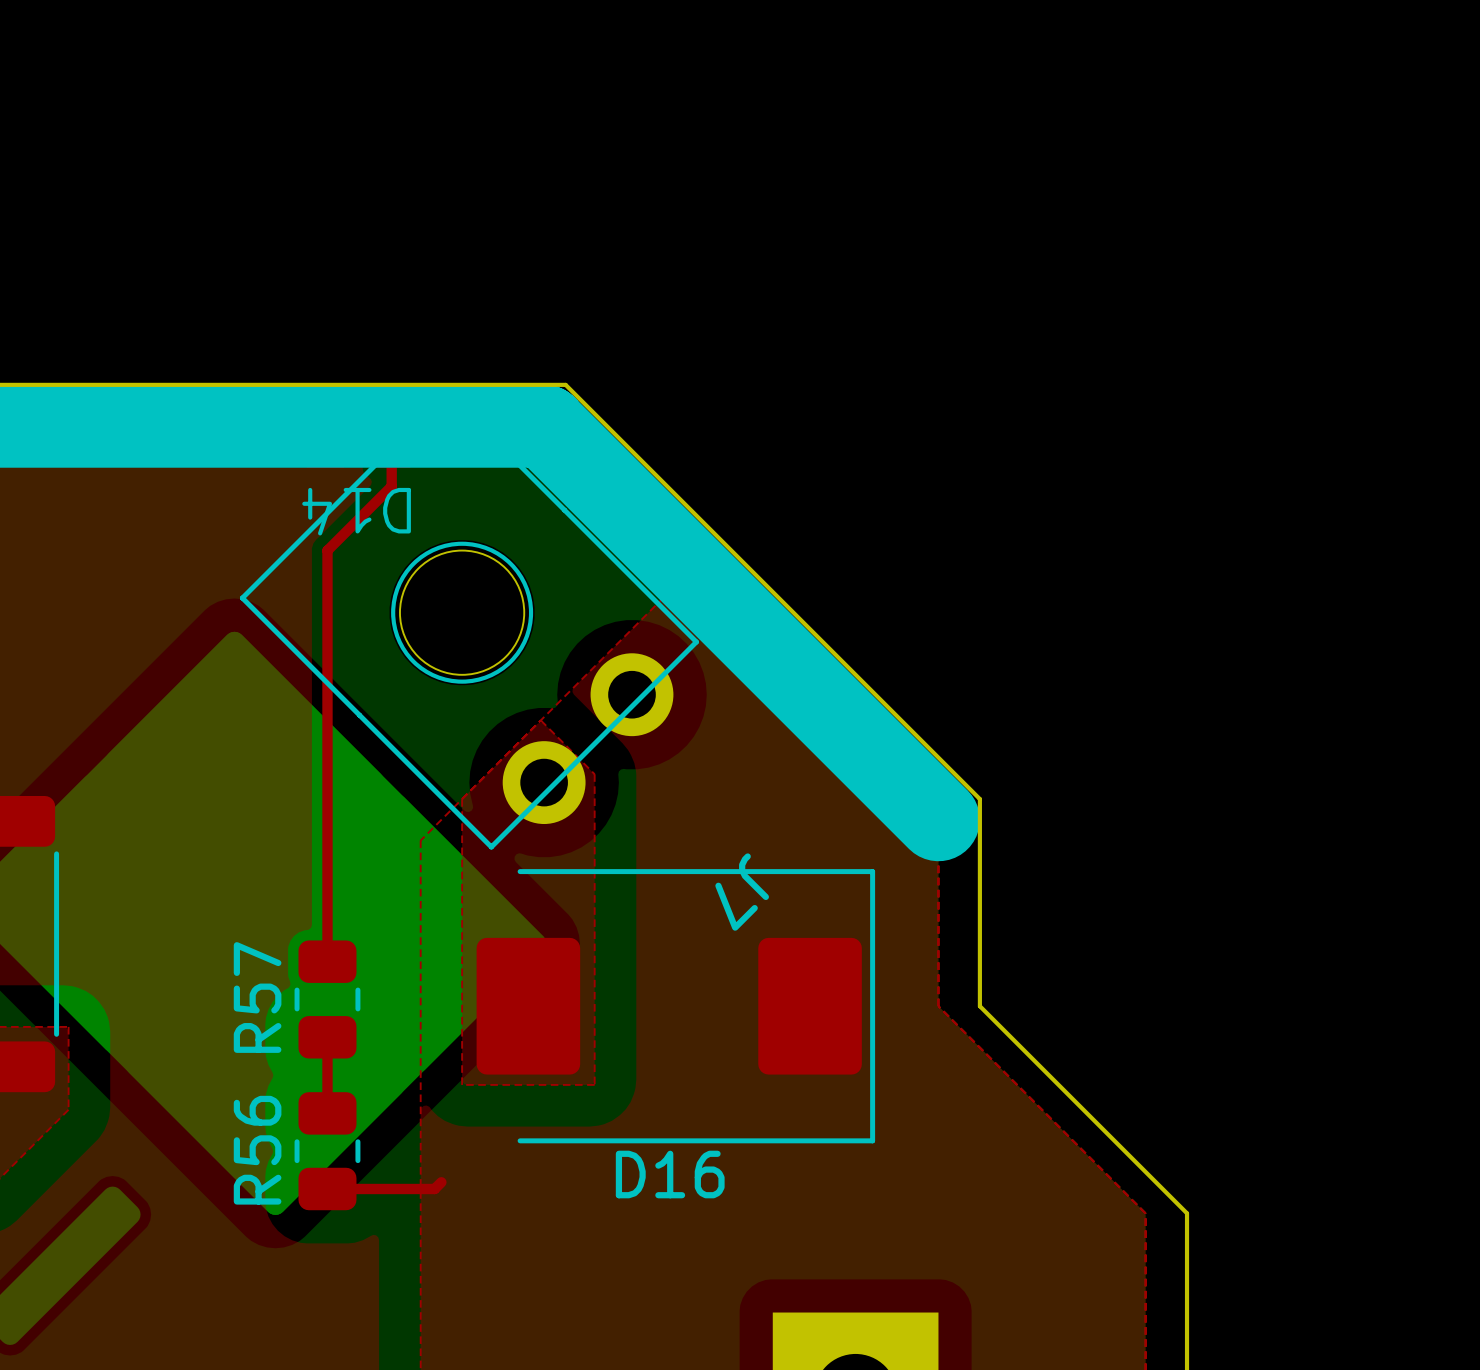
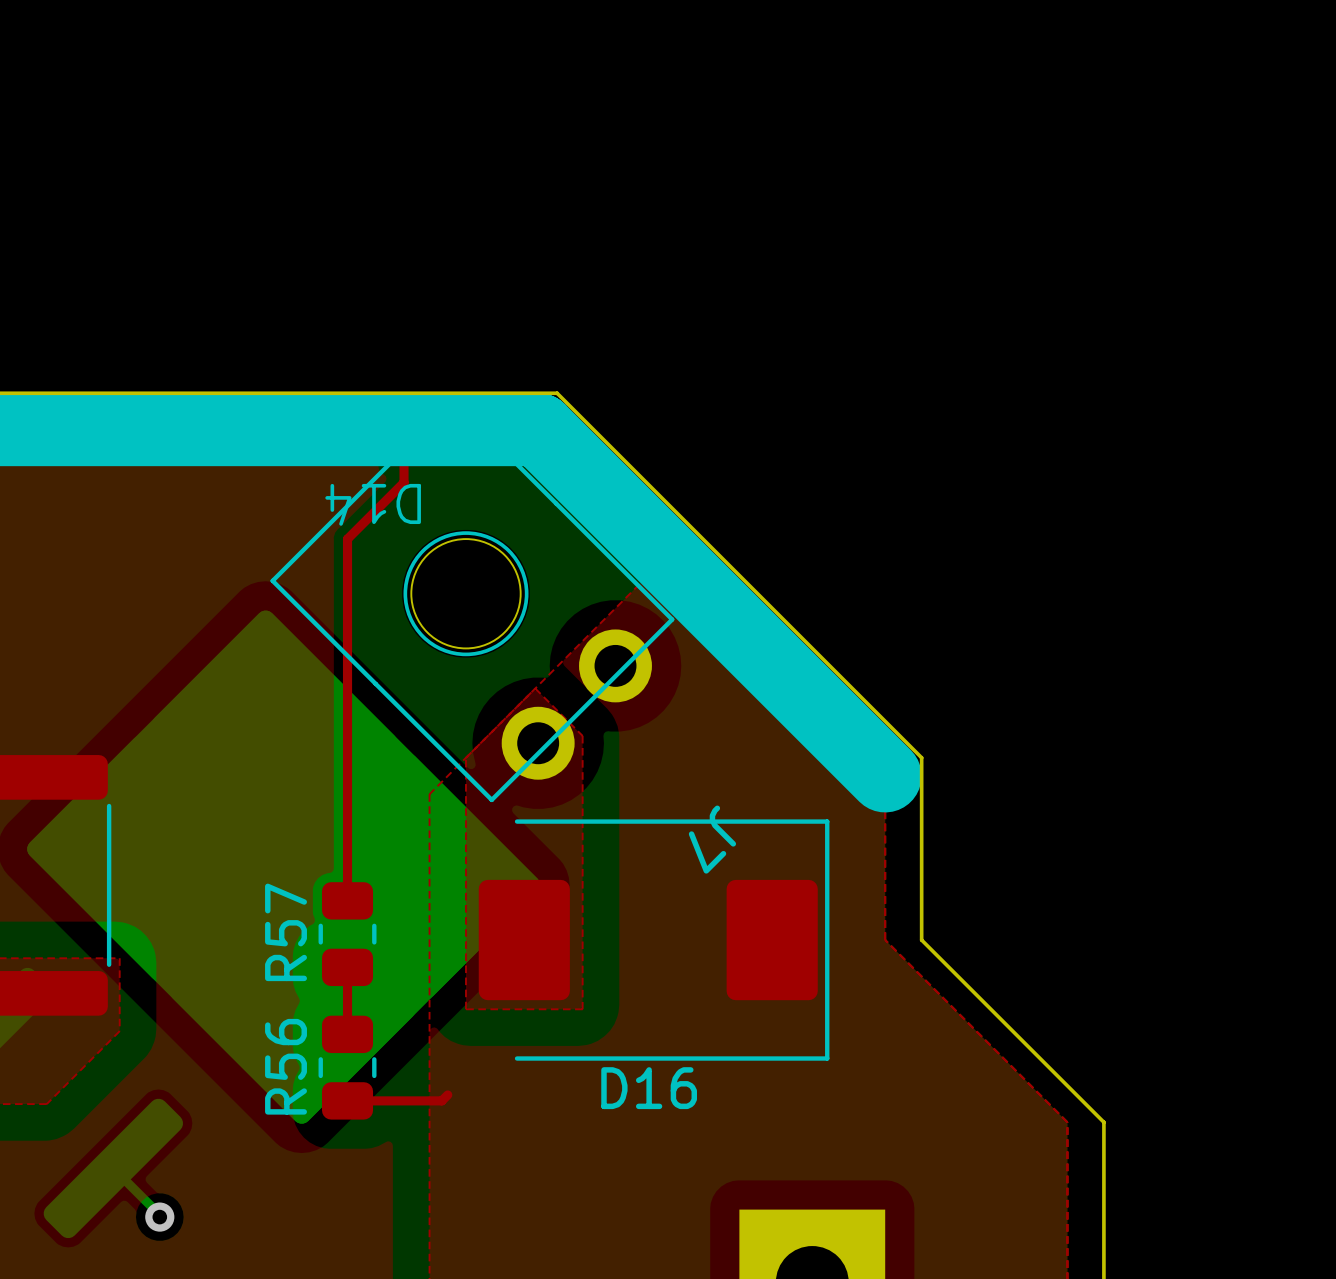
bottom track: none -> (113, 1168) (159, 1214) (159, 1217)
via: none -> (159, 1217)

